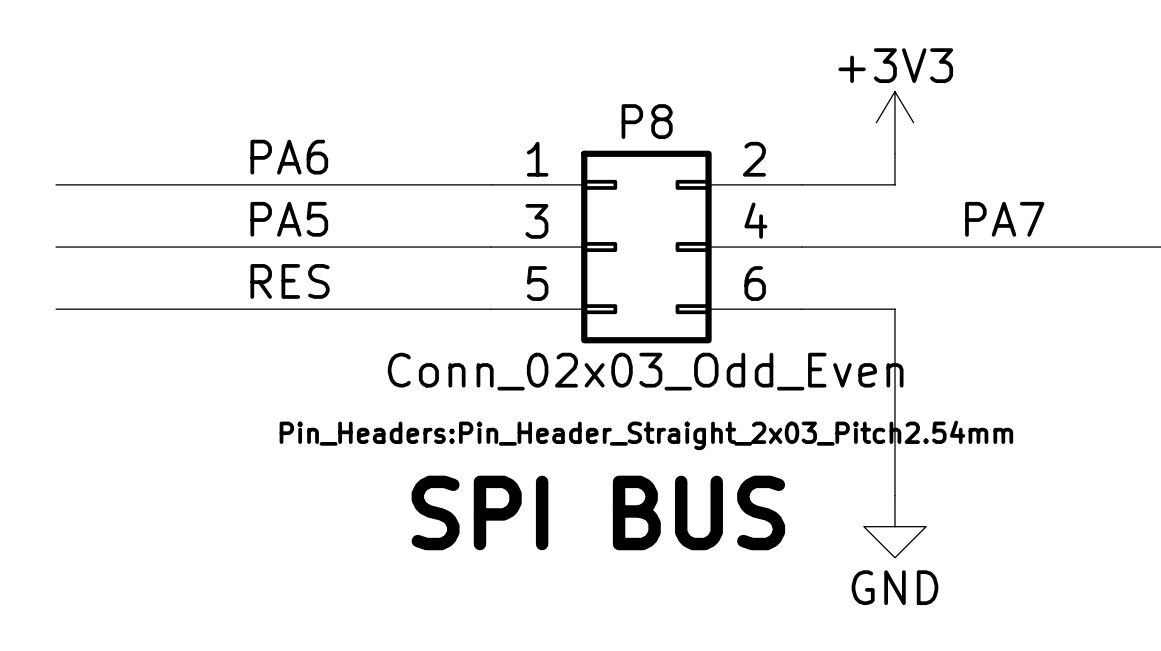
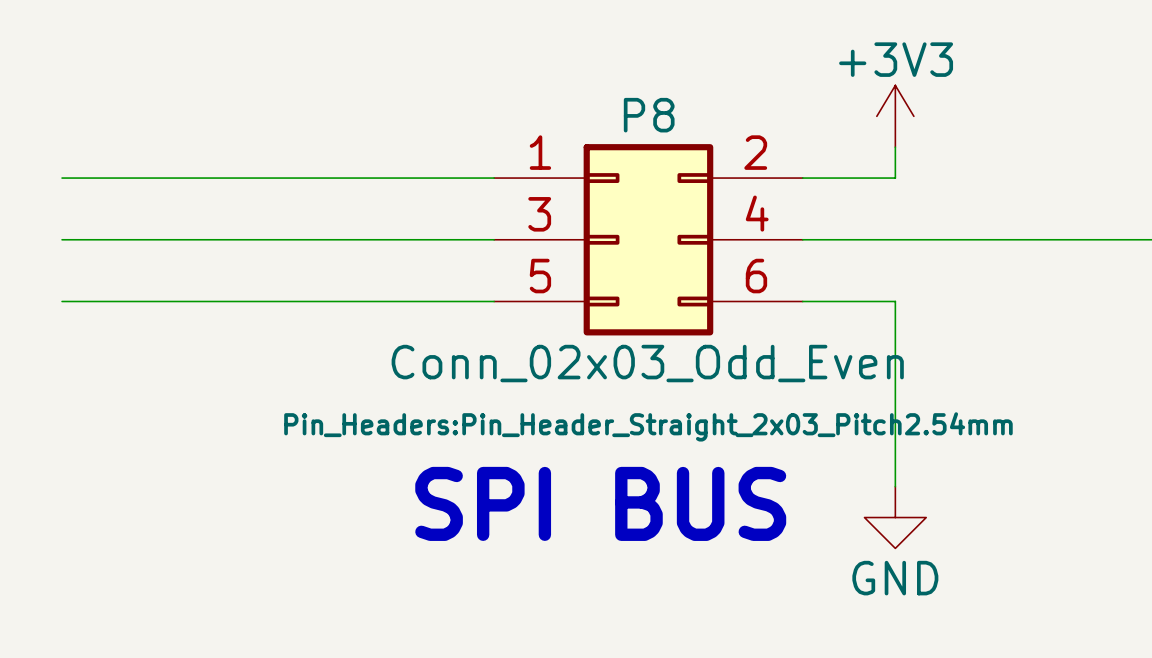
label: PA6 (289, 157) -> none
label: PA5 (289, 219) -> none
label: PA7 (1004, 219) -> none
label: RES (290, 281) -> none

